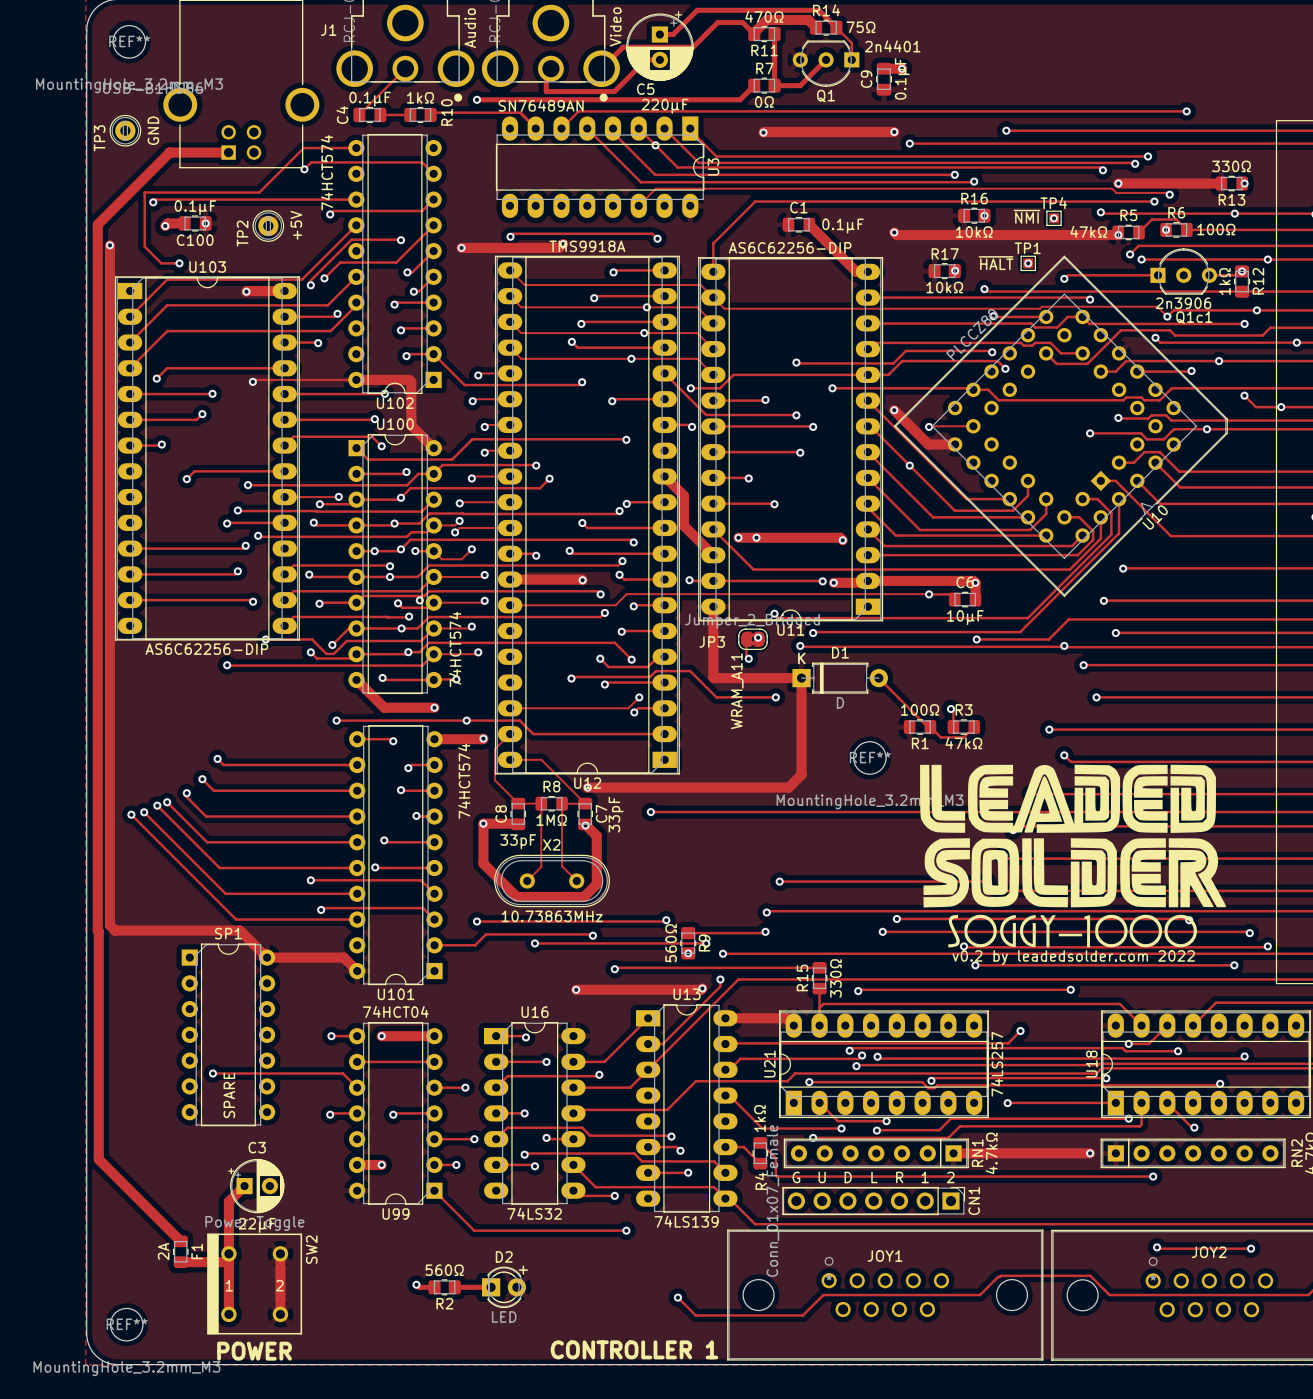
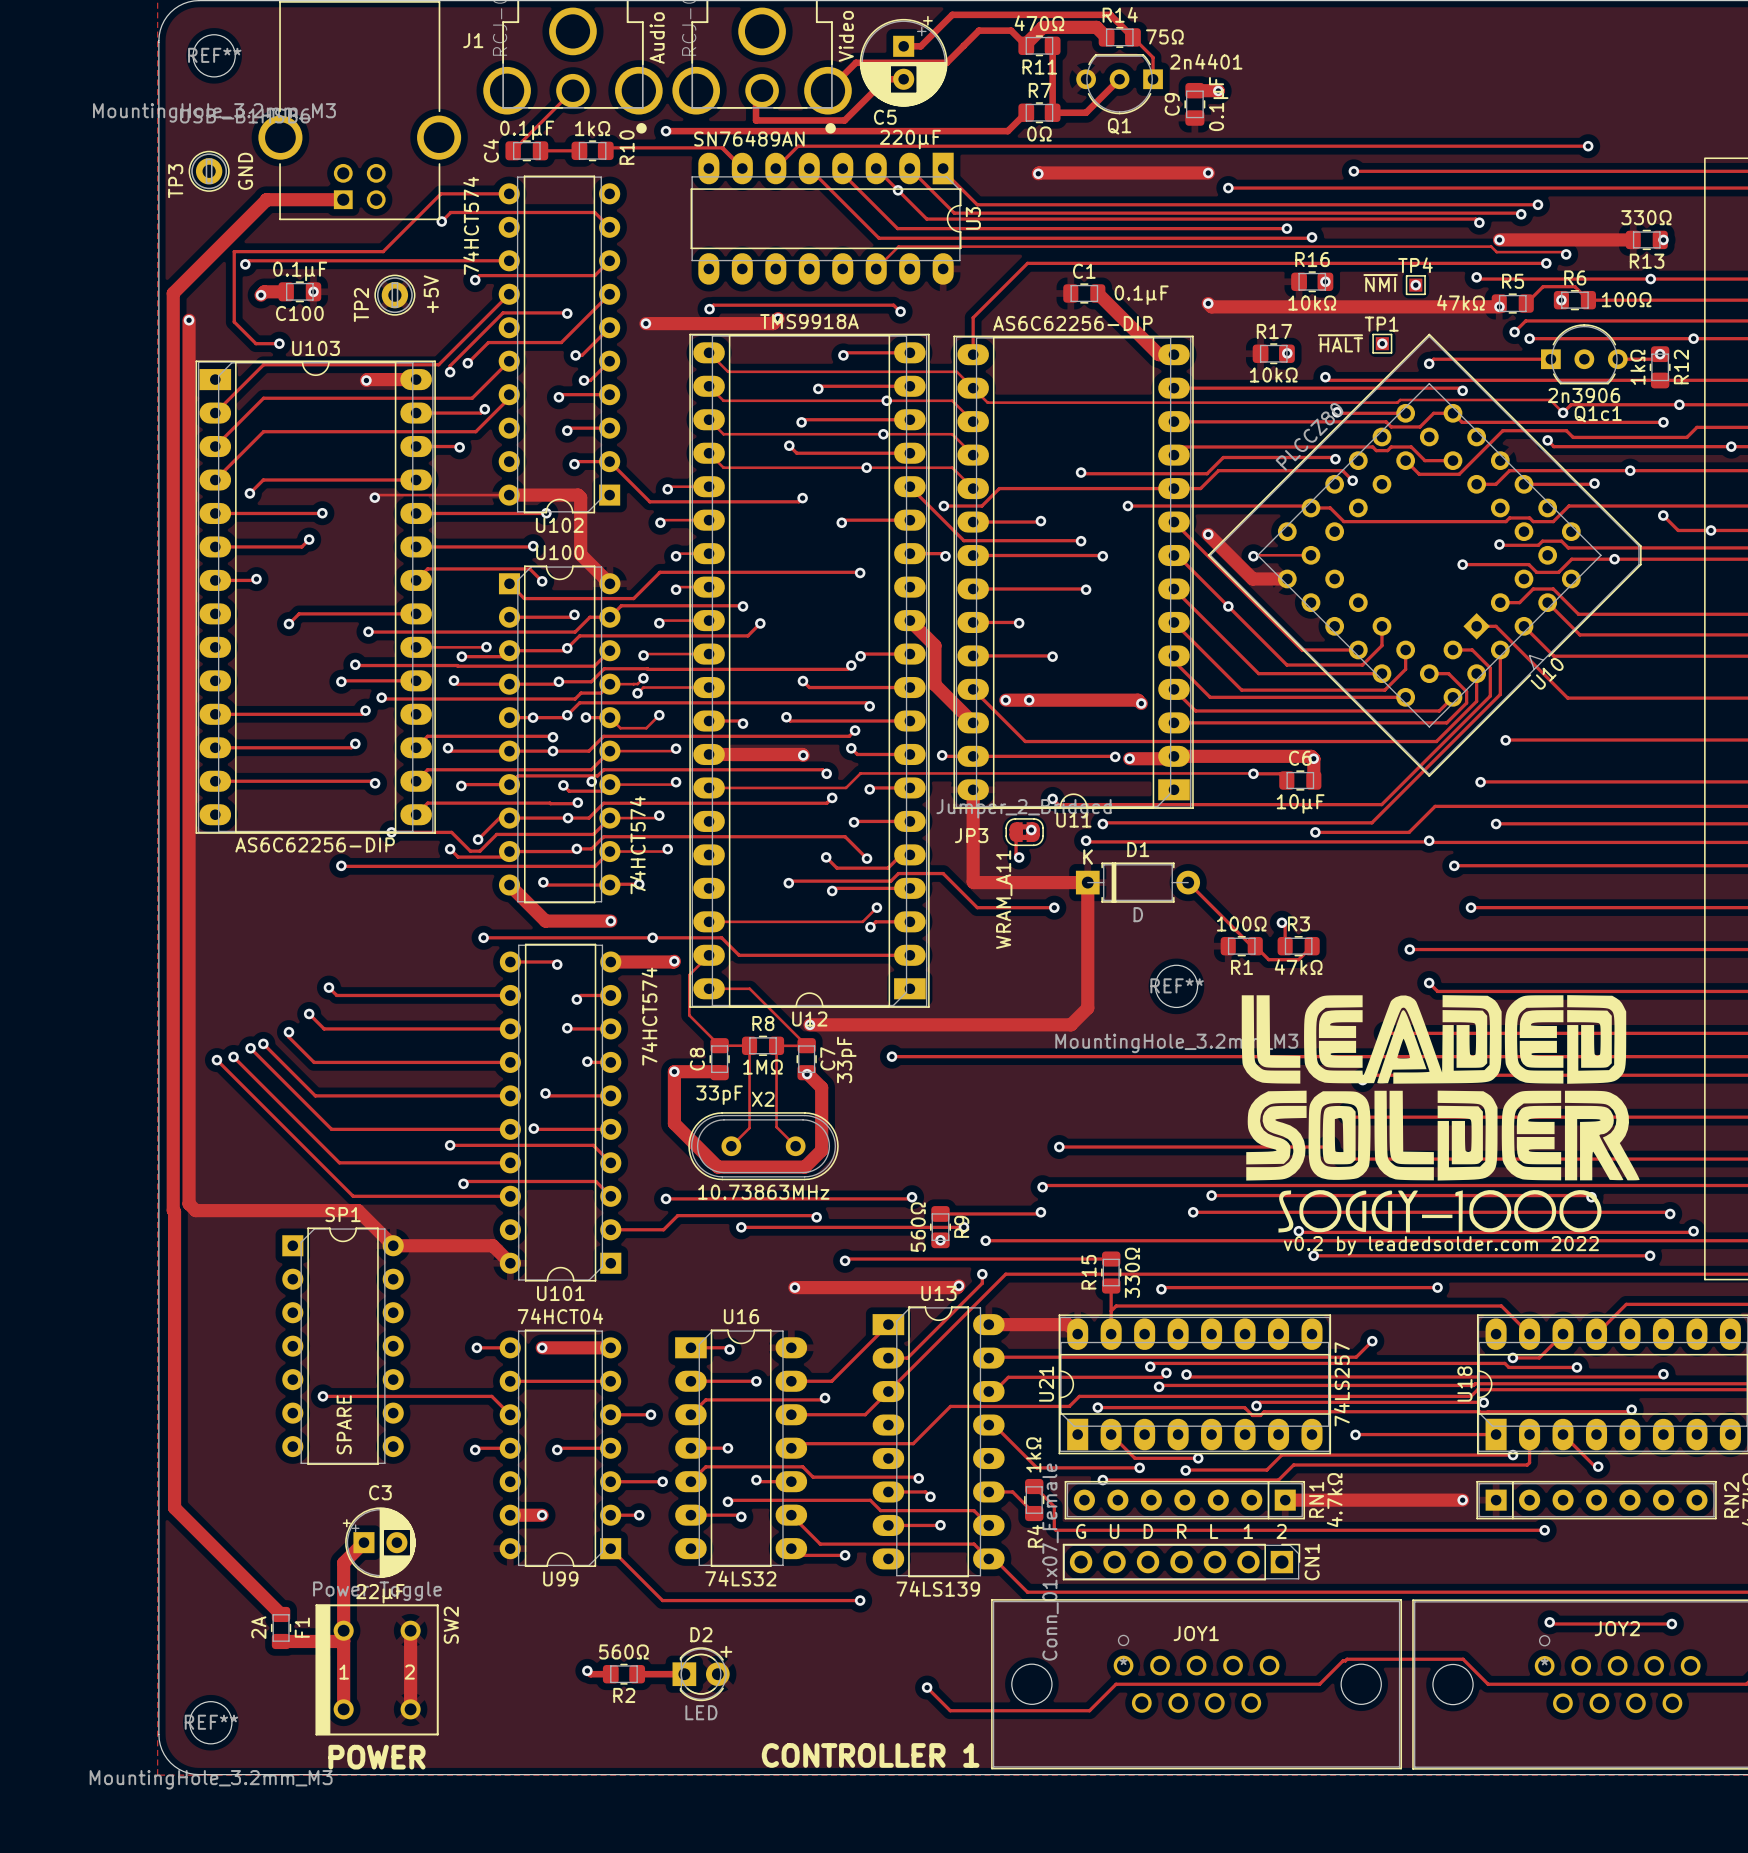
text: L (874, 1177) -> R (1181, 1531)
text: R (899, 1177) -> L (1214, 1531)

